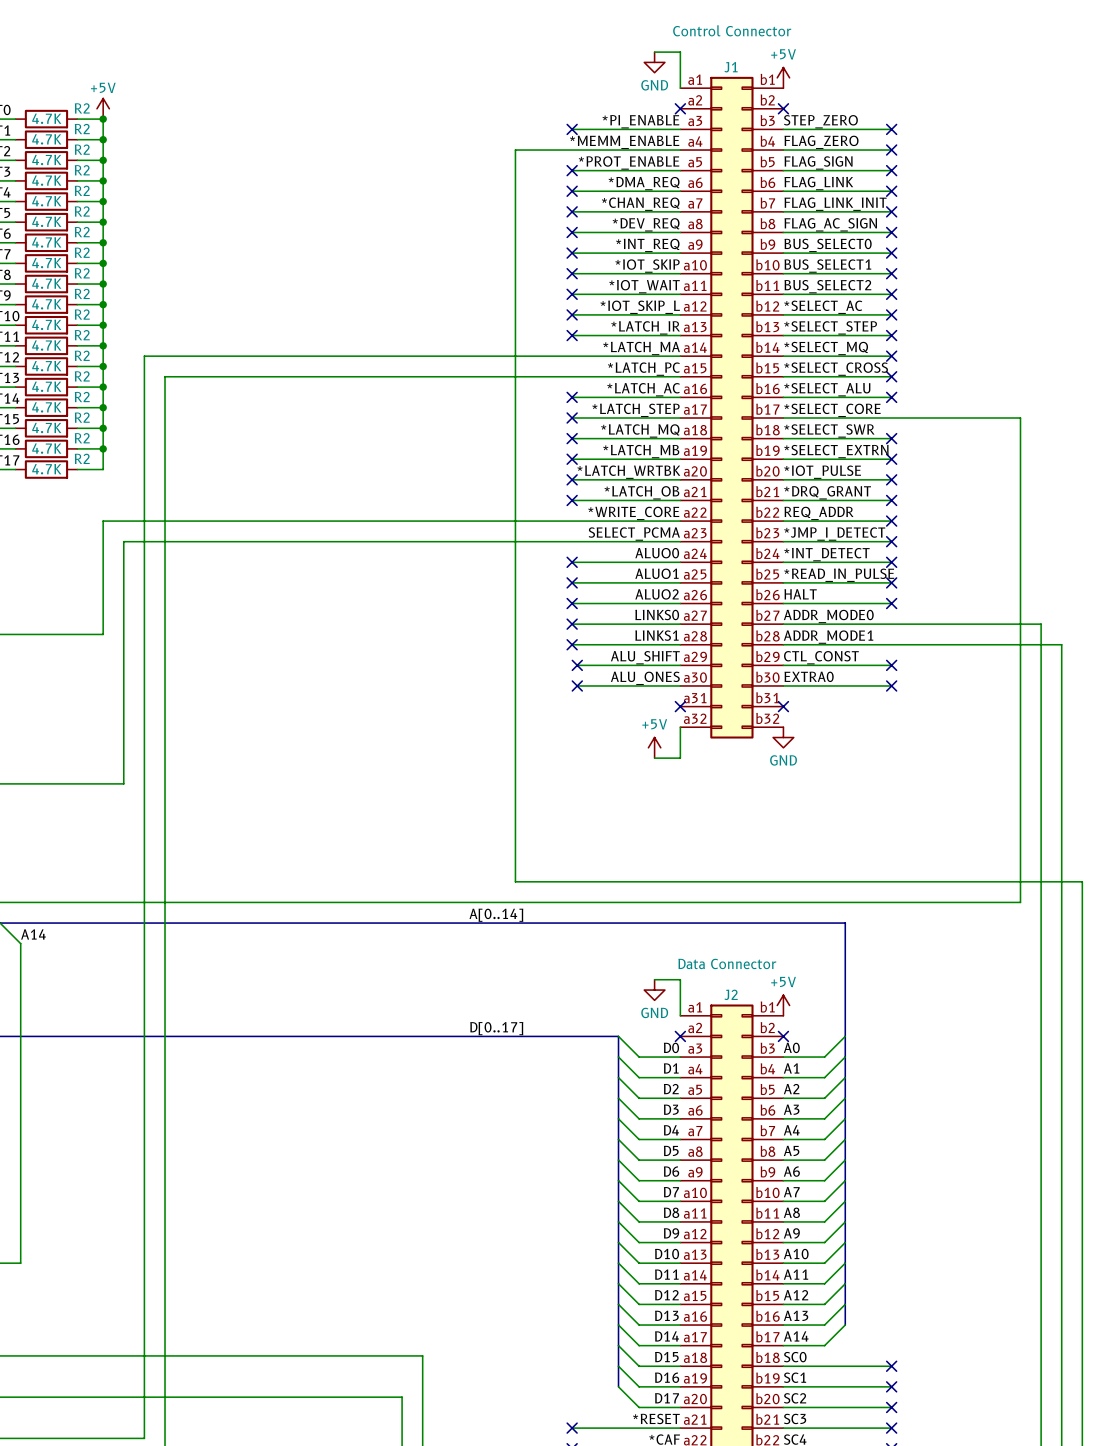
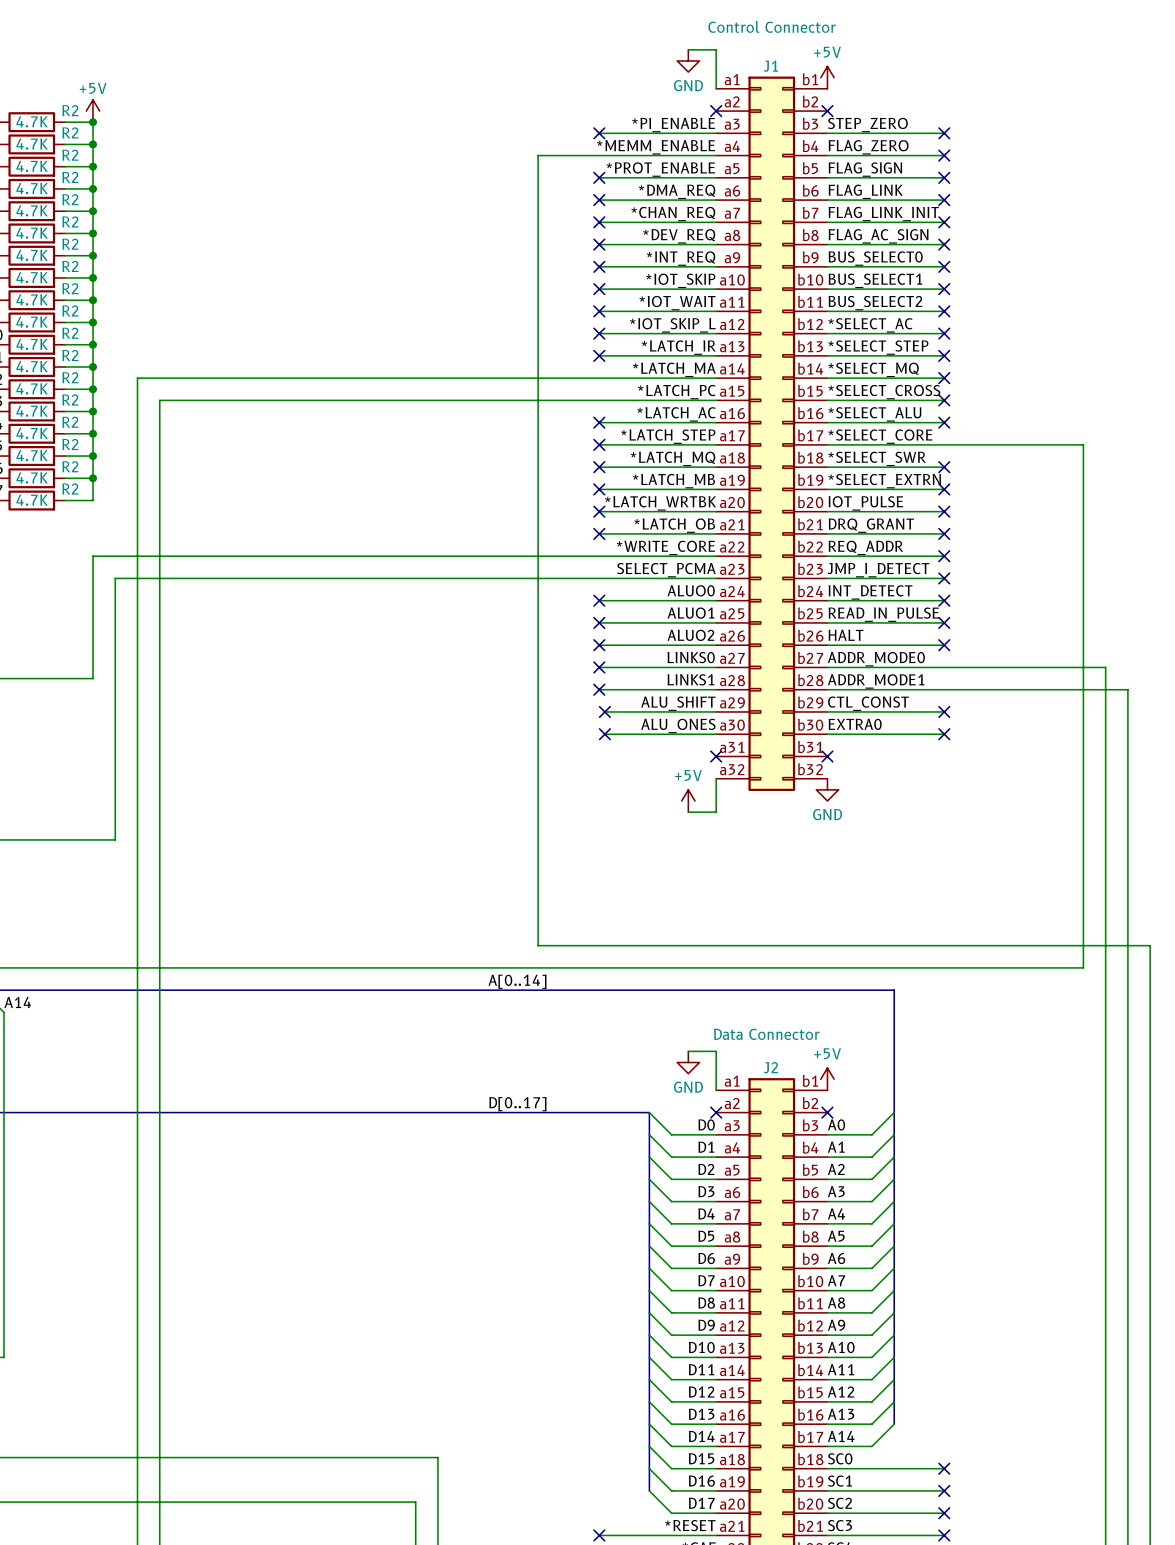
label: *IOT_PULSE (822, 472) -> IOT_PULSE (865, 503)
label: *DRQ_GRANT (827, 492) -> DRQ_GRANT (871, 525)
label: *JMP_I_DETECT (834, 534) -> JMP_I_DETECT (878, 570)
label: *INT_DETECT (826, 554) -> INT_DETECT (870, 592)
label: *READ_IN_PULSE (839, 575) -> READ_IN_PULSE (883, 614)

